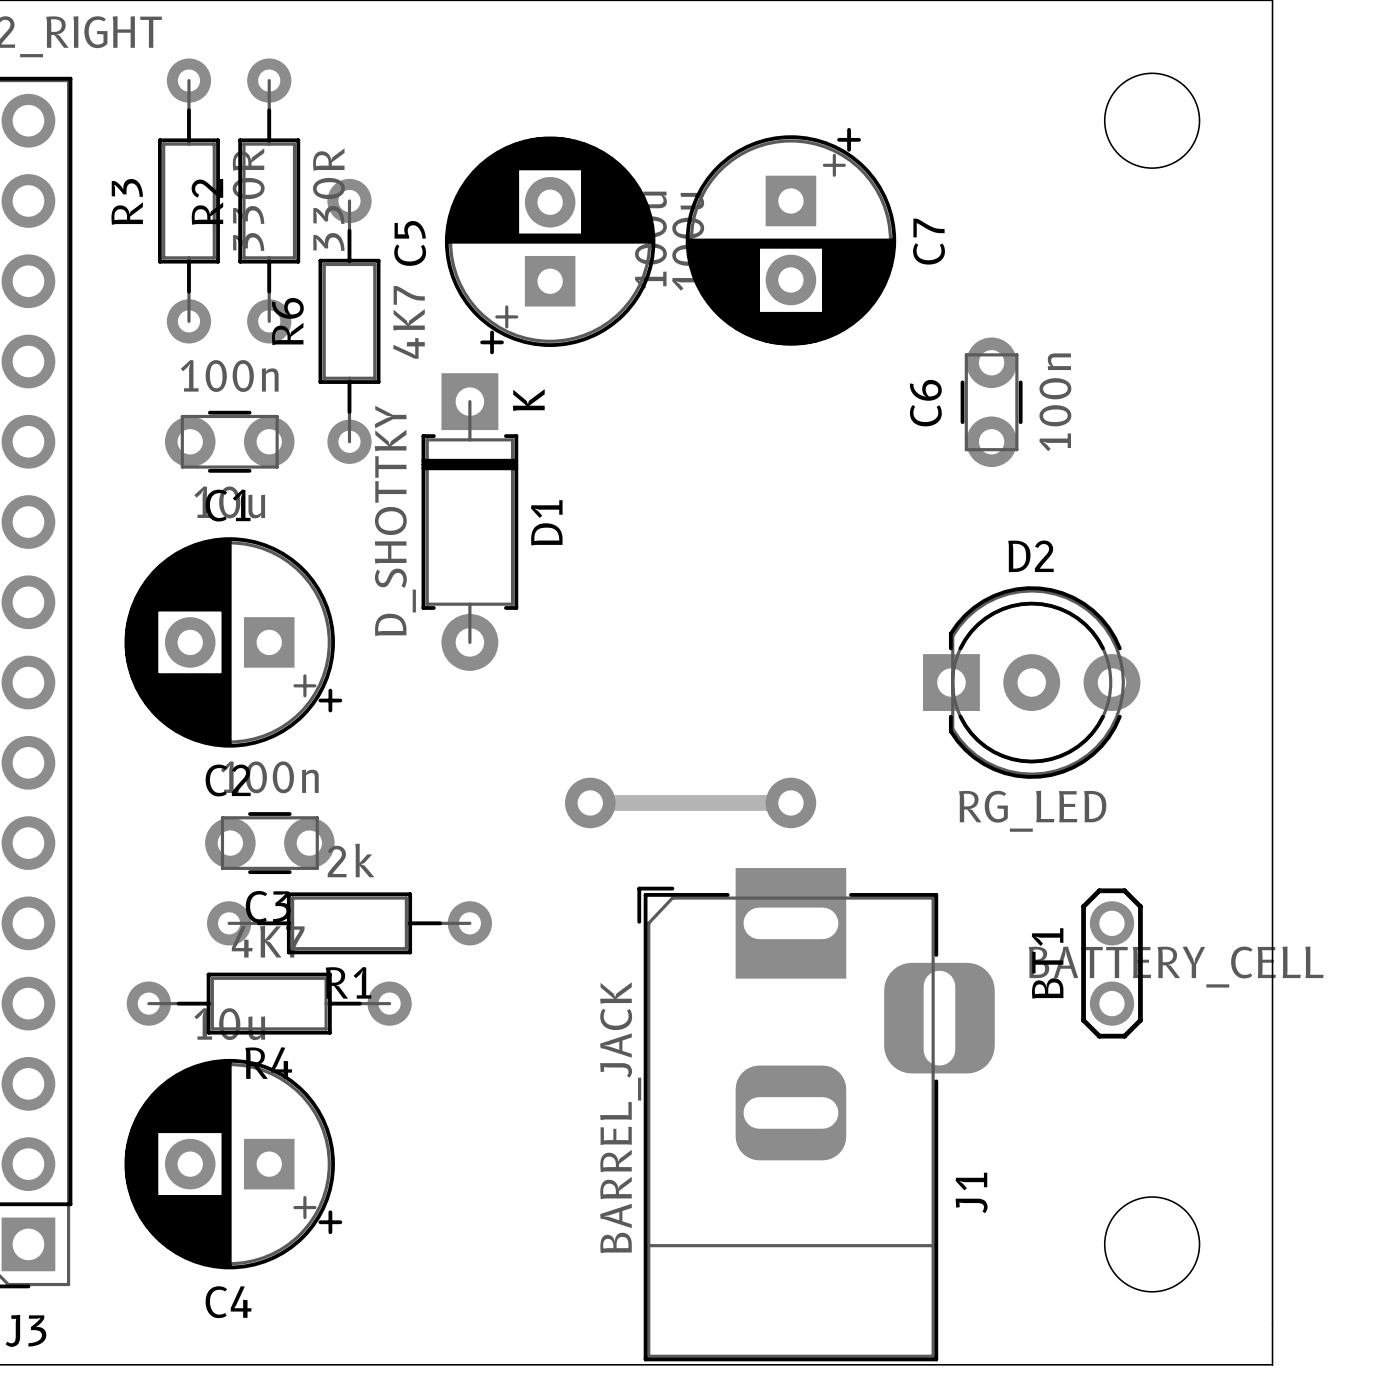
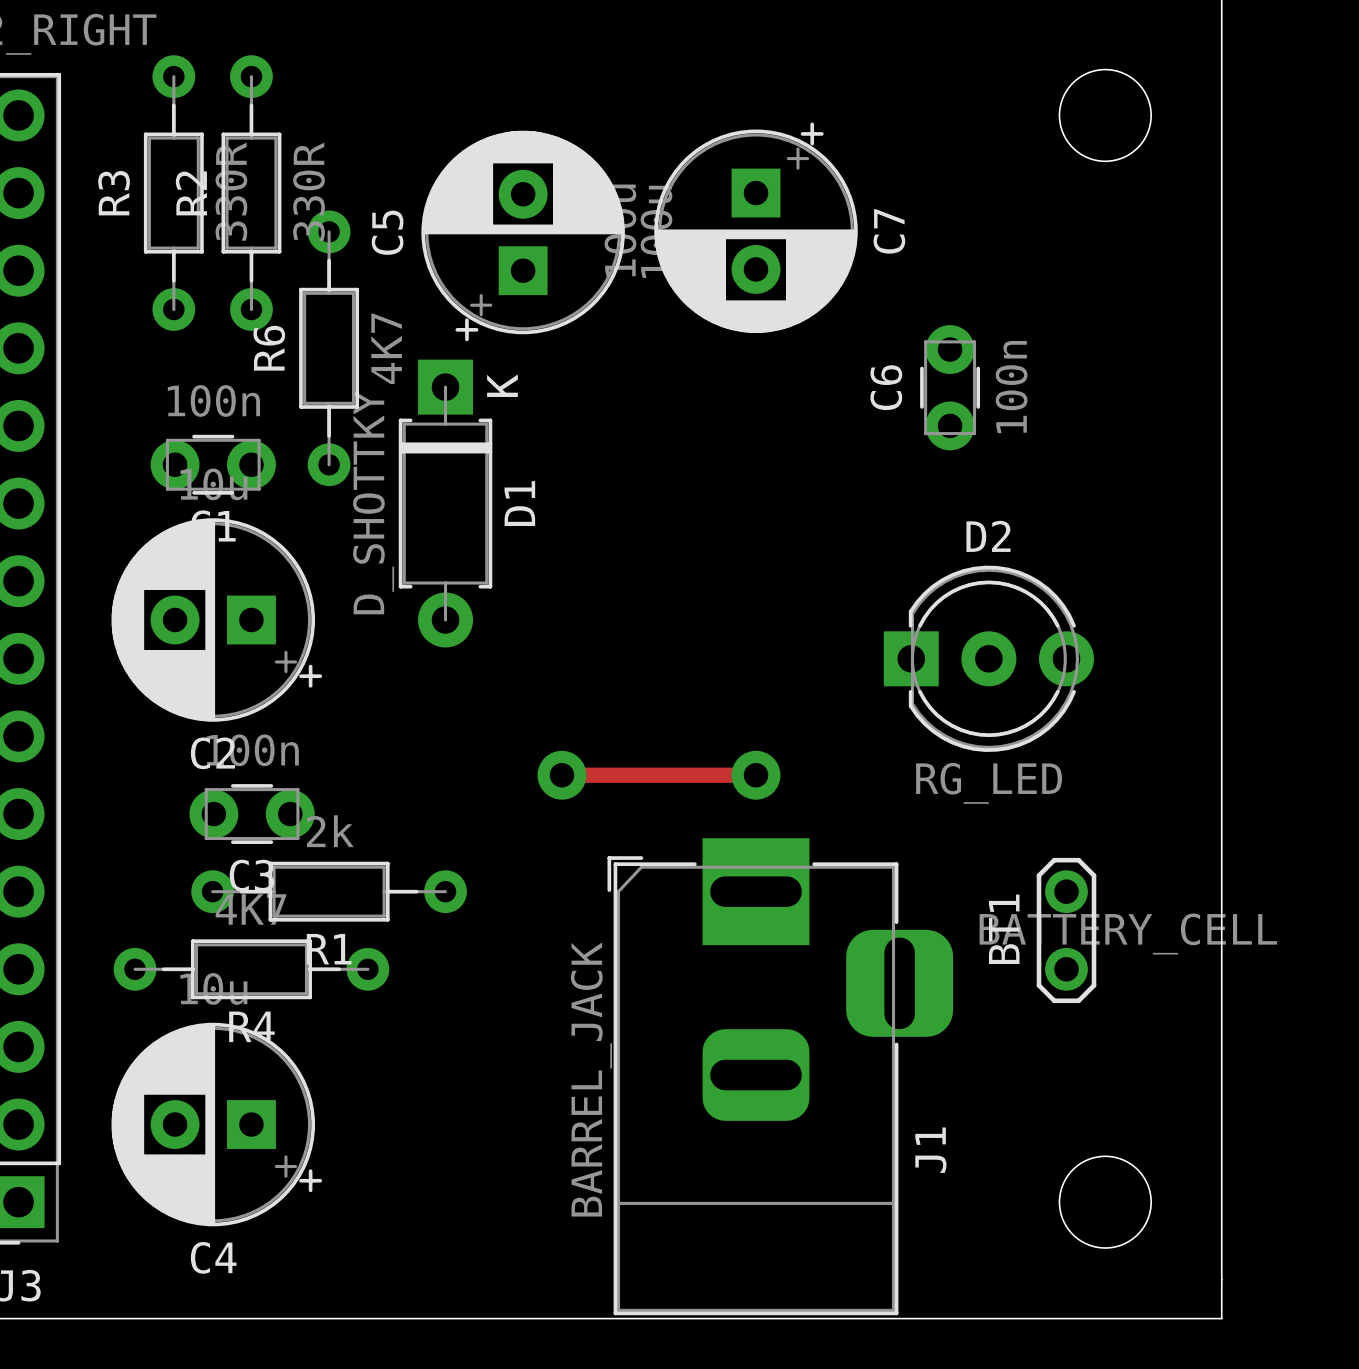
R6 position: (349, 321) -> (329, 348)
C1 position: (229, 441) -> (213, 464)

